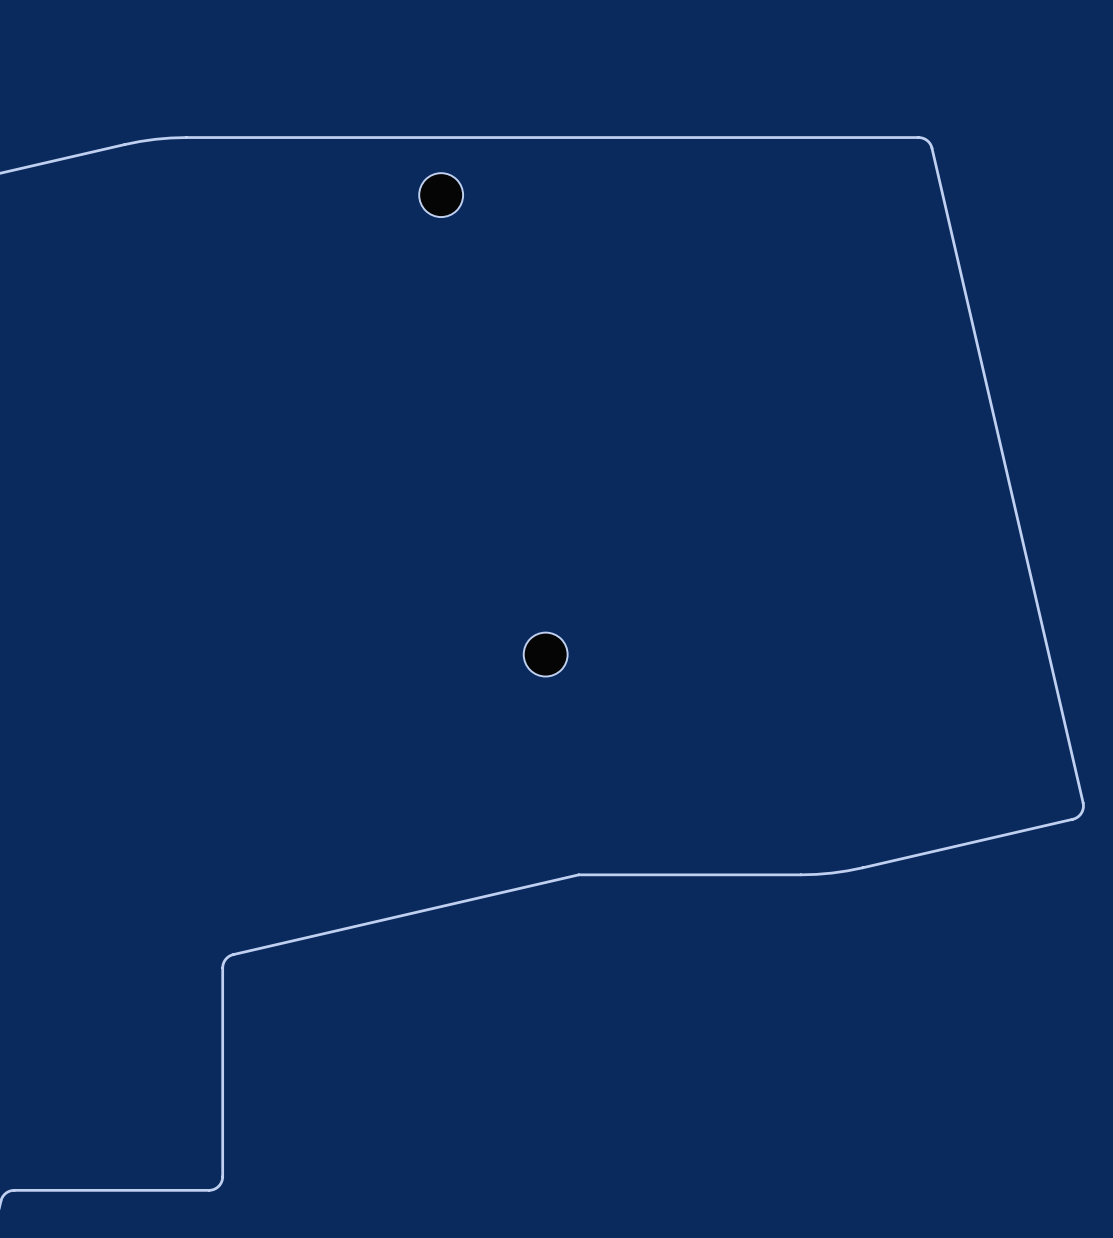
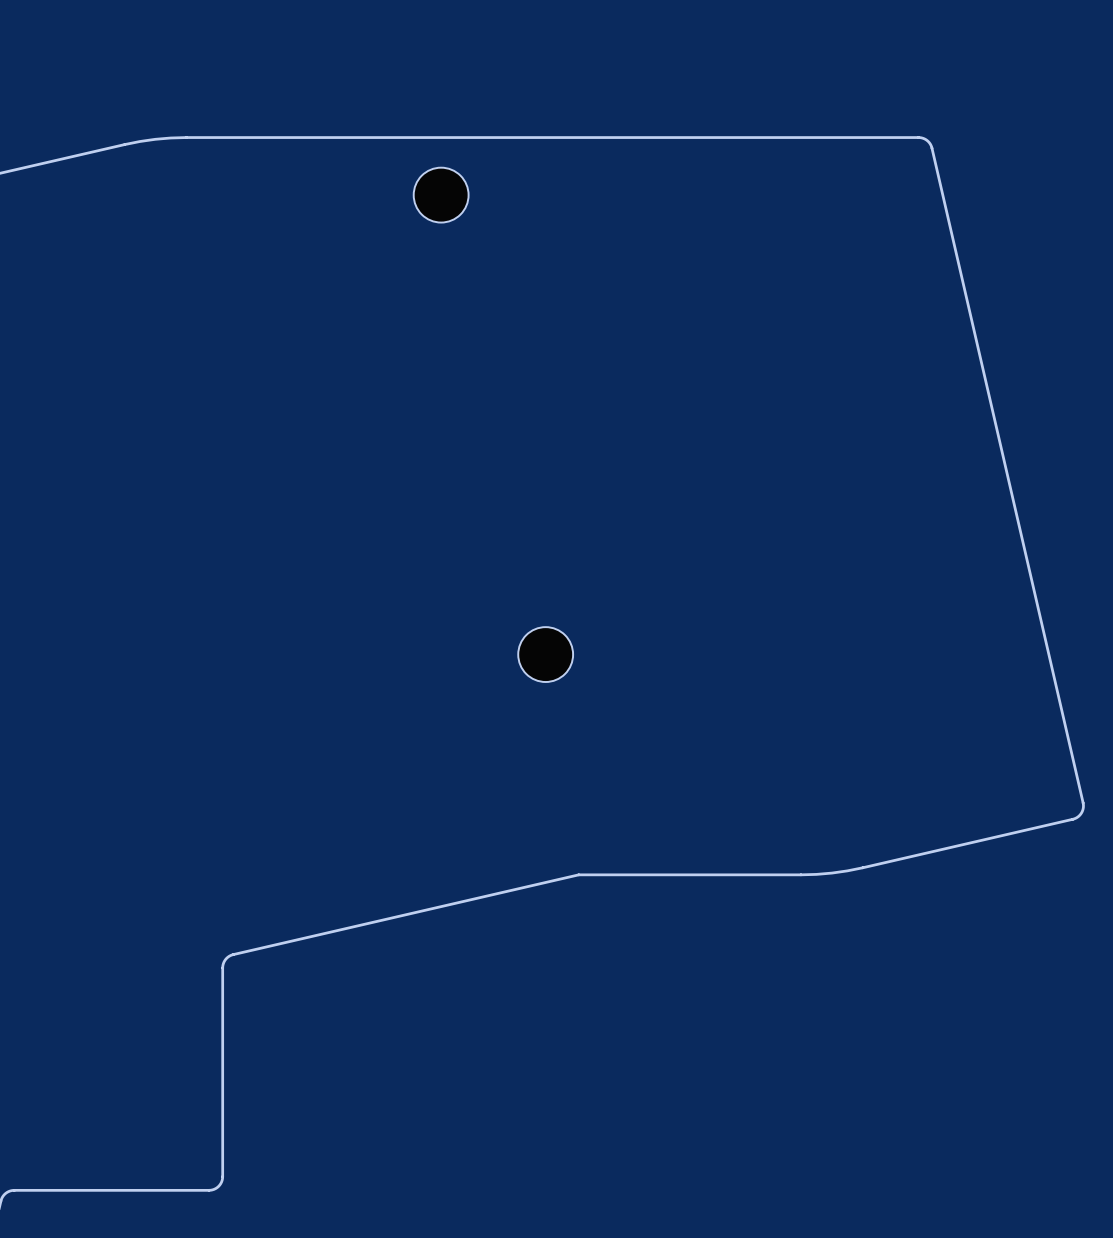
part footprint: [419, 173, 464, 218] -> [413, 167, 469, 223]
part footprint: [523, 632, 568, 677] -> [518, 627, 574, 683]

